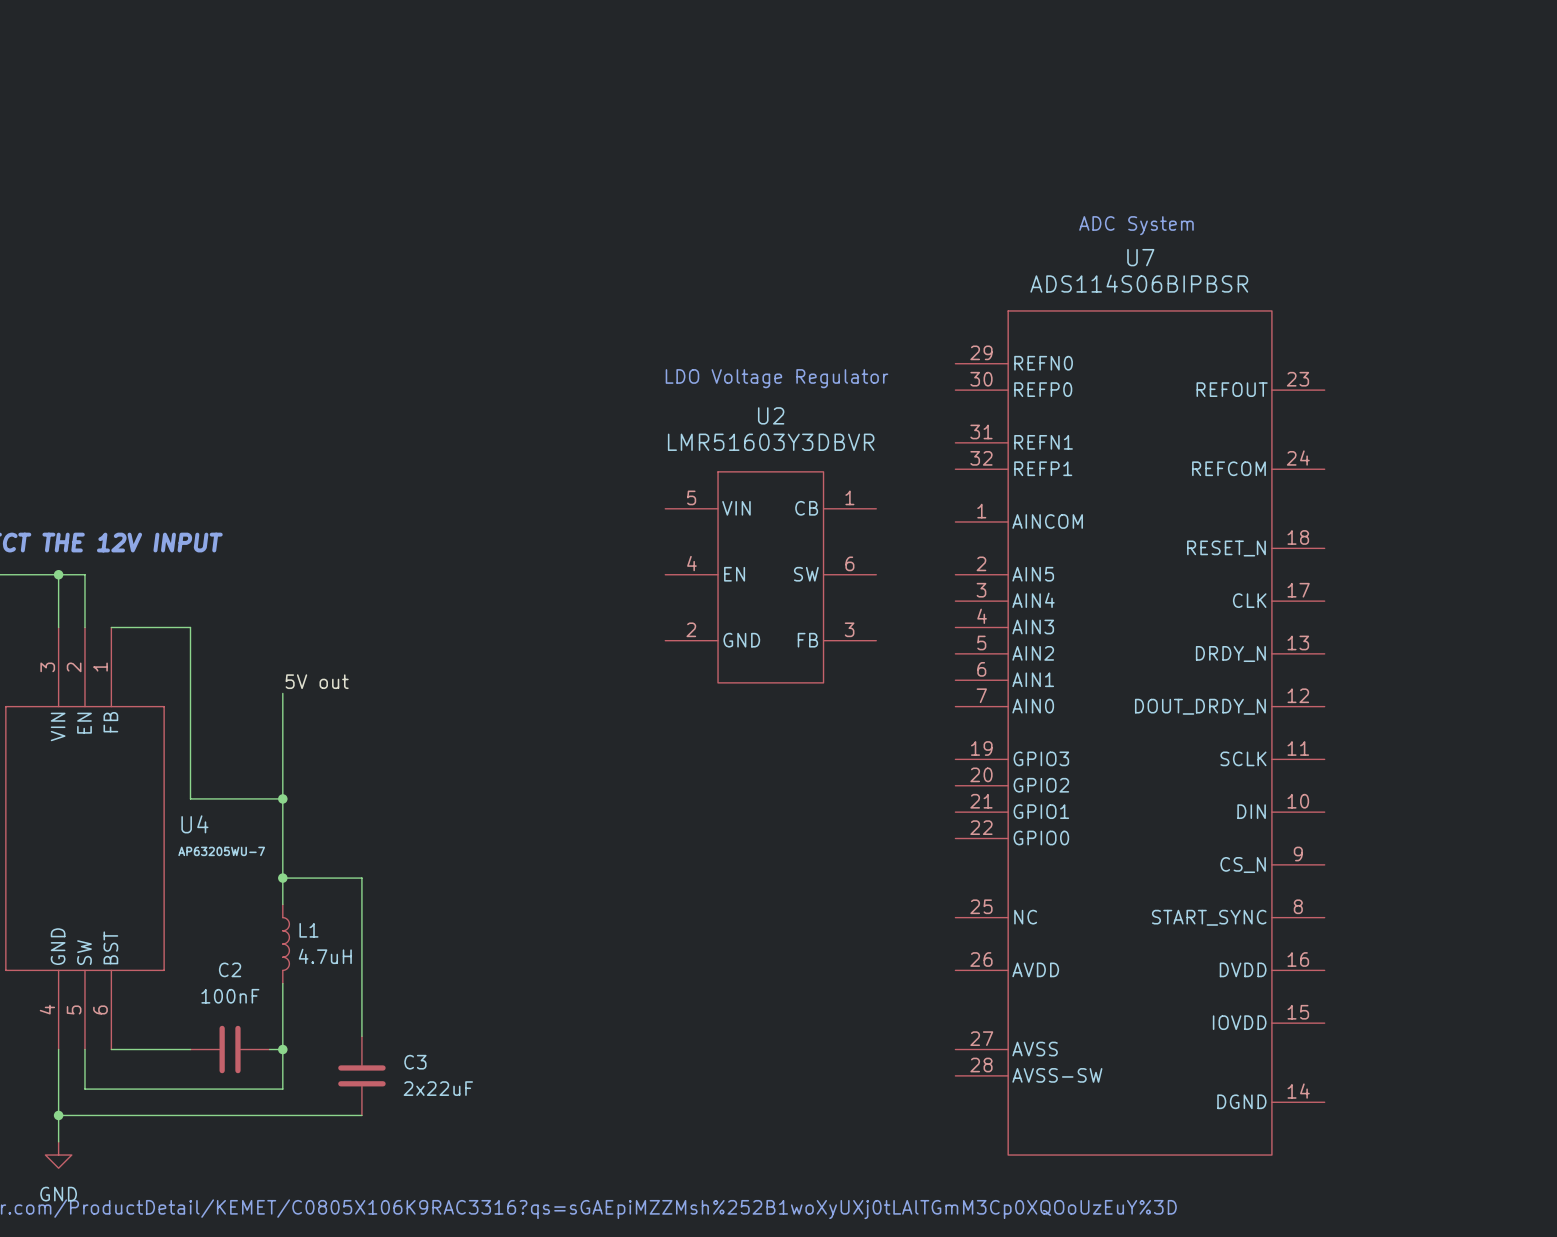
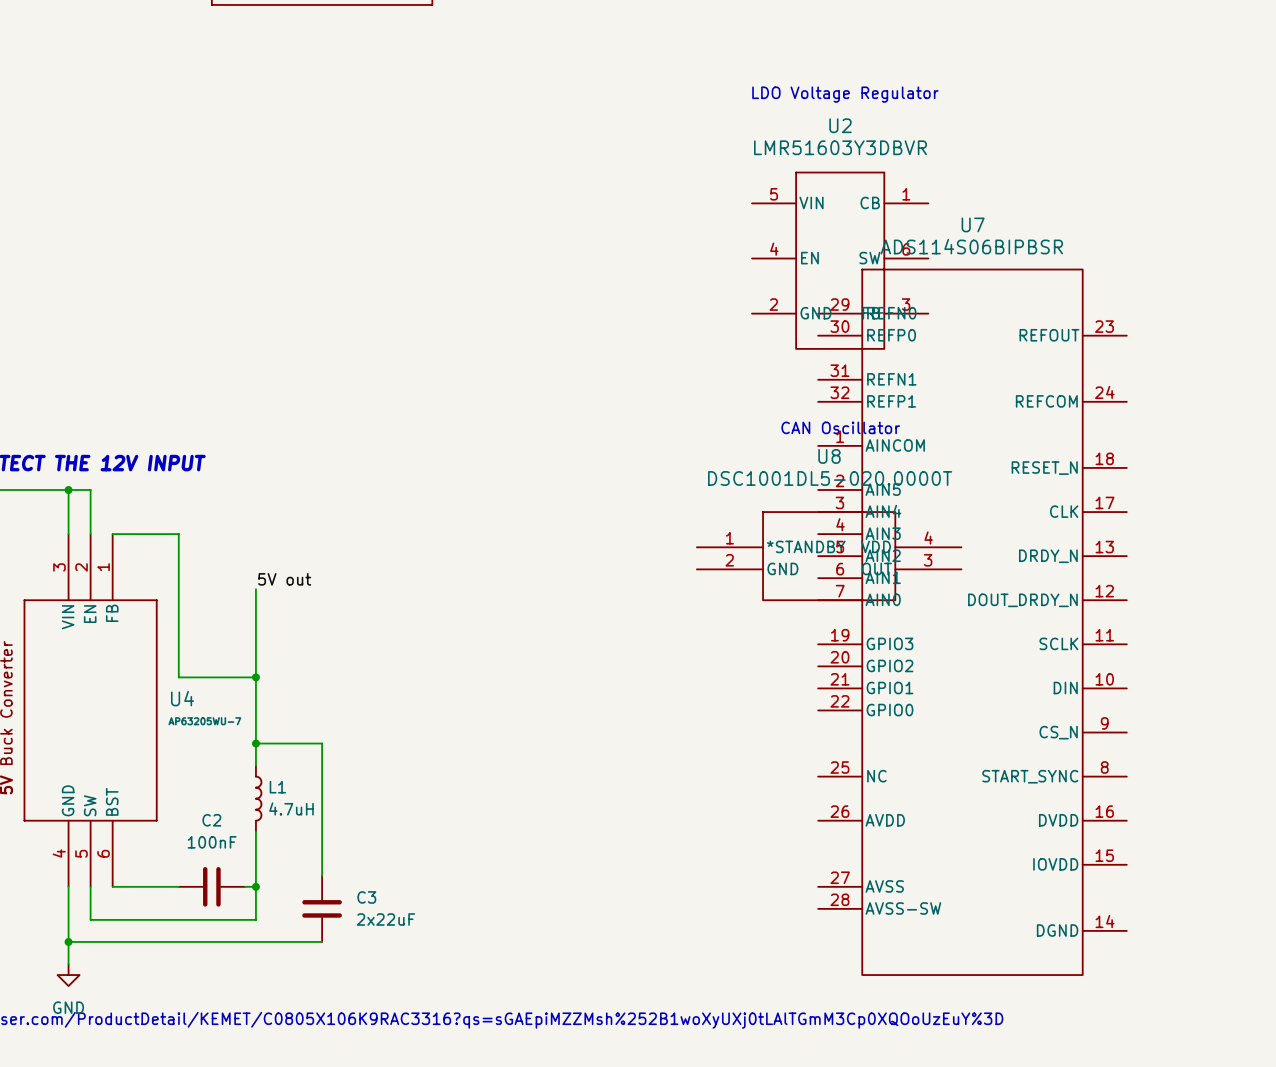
text: none -> LDO Voltage Regulator (845, 94)
text: ADC System (1136, 225) -> none
text: LDO Voltage Regulator (776, 378) -> none
text: none -> CAN Oscillator (840, 427)
U2 position: (770, 577) -> (840, 260)
U8: none -> DSC1001DL5-020.0000T (829, 556)

